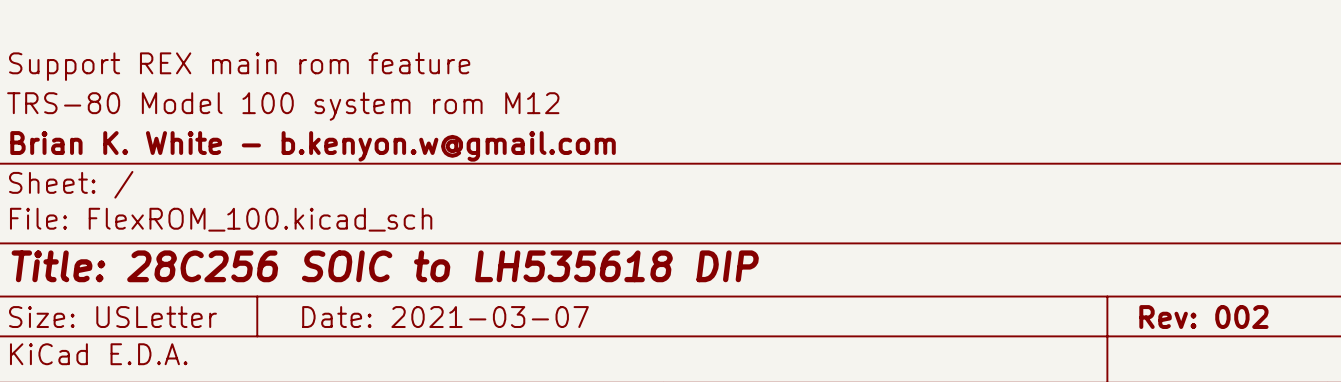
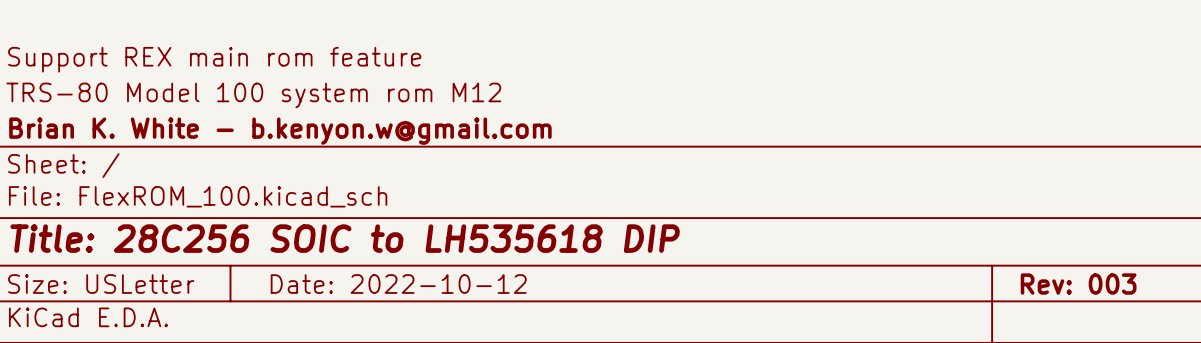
title block: Date: 2021-03-07 (445, 317) -> Date: 2022-10-12 (398, 284)
title block: Rev: 002 (1203, 317) -> Rev: 003 (1078, 284)

